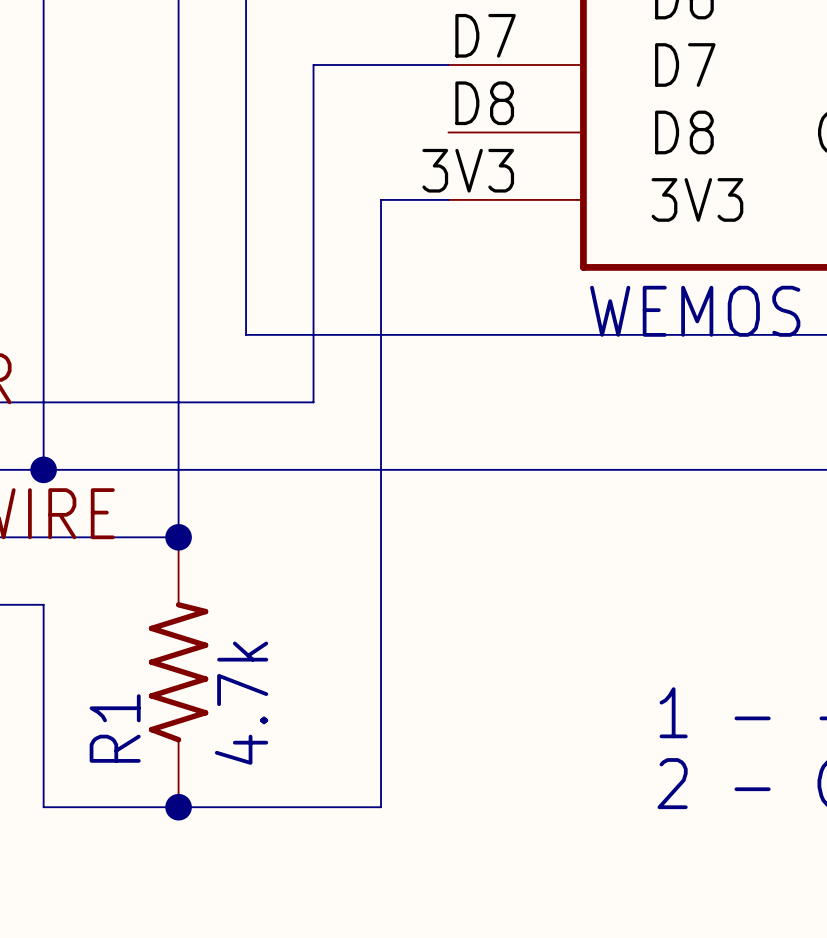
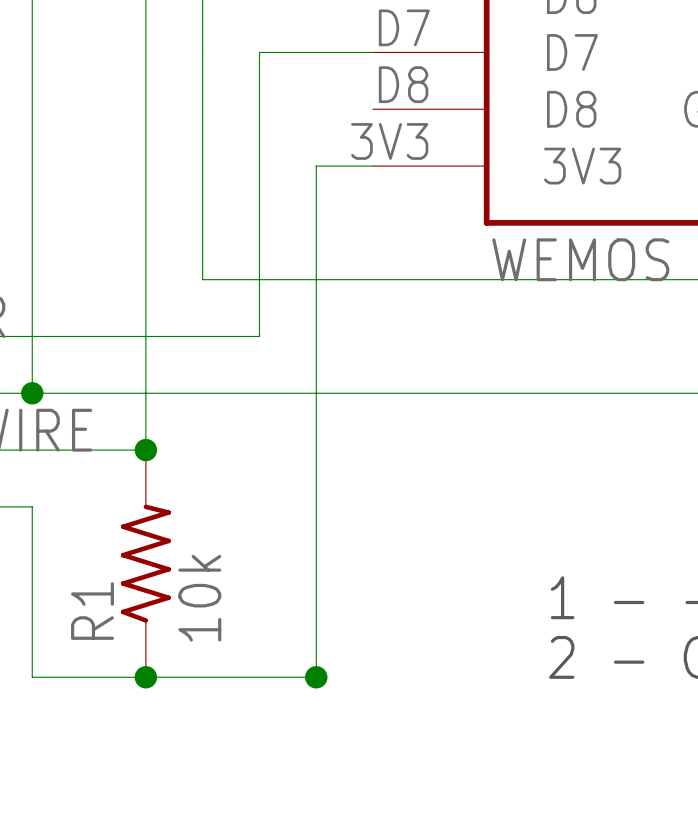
R1 value: 4.7k (241, 703) -> 10k (199, 598)
junction: none -> (316, 677)

